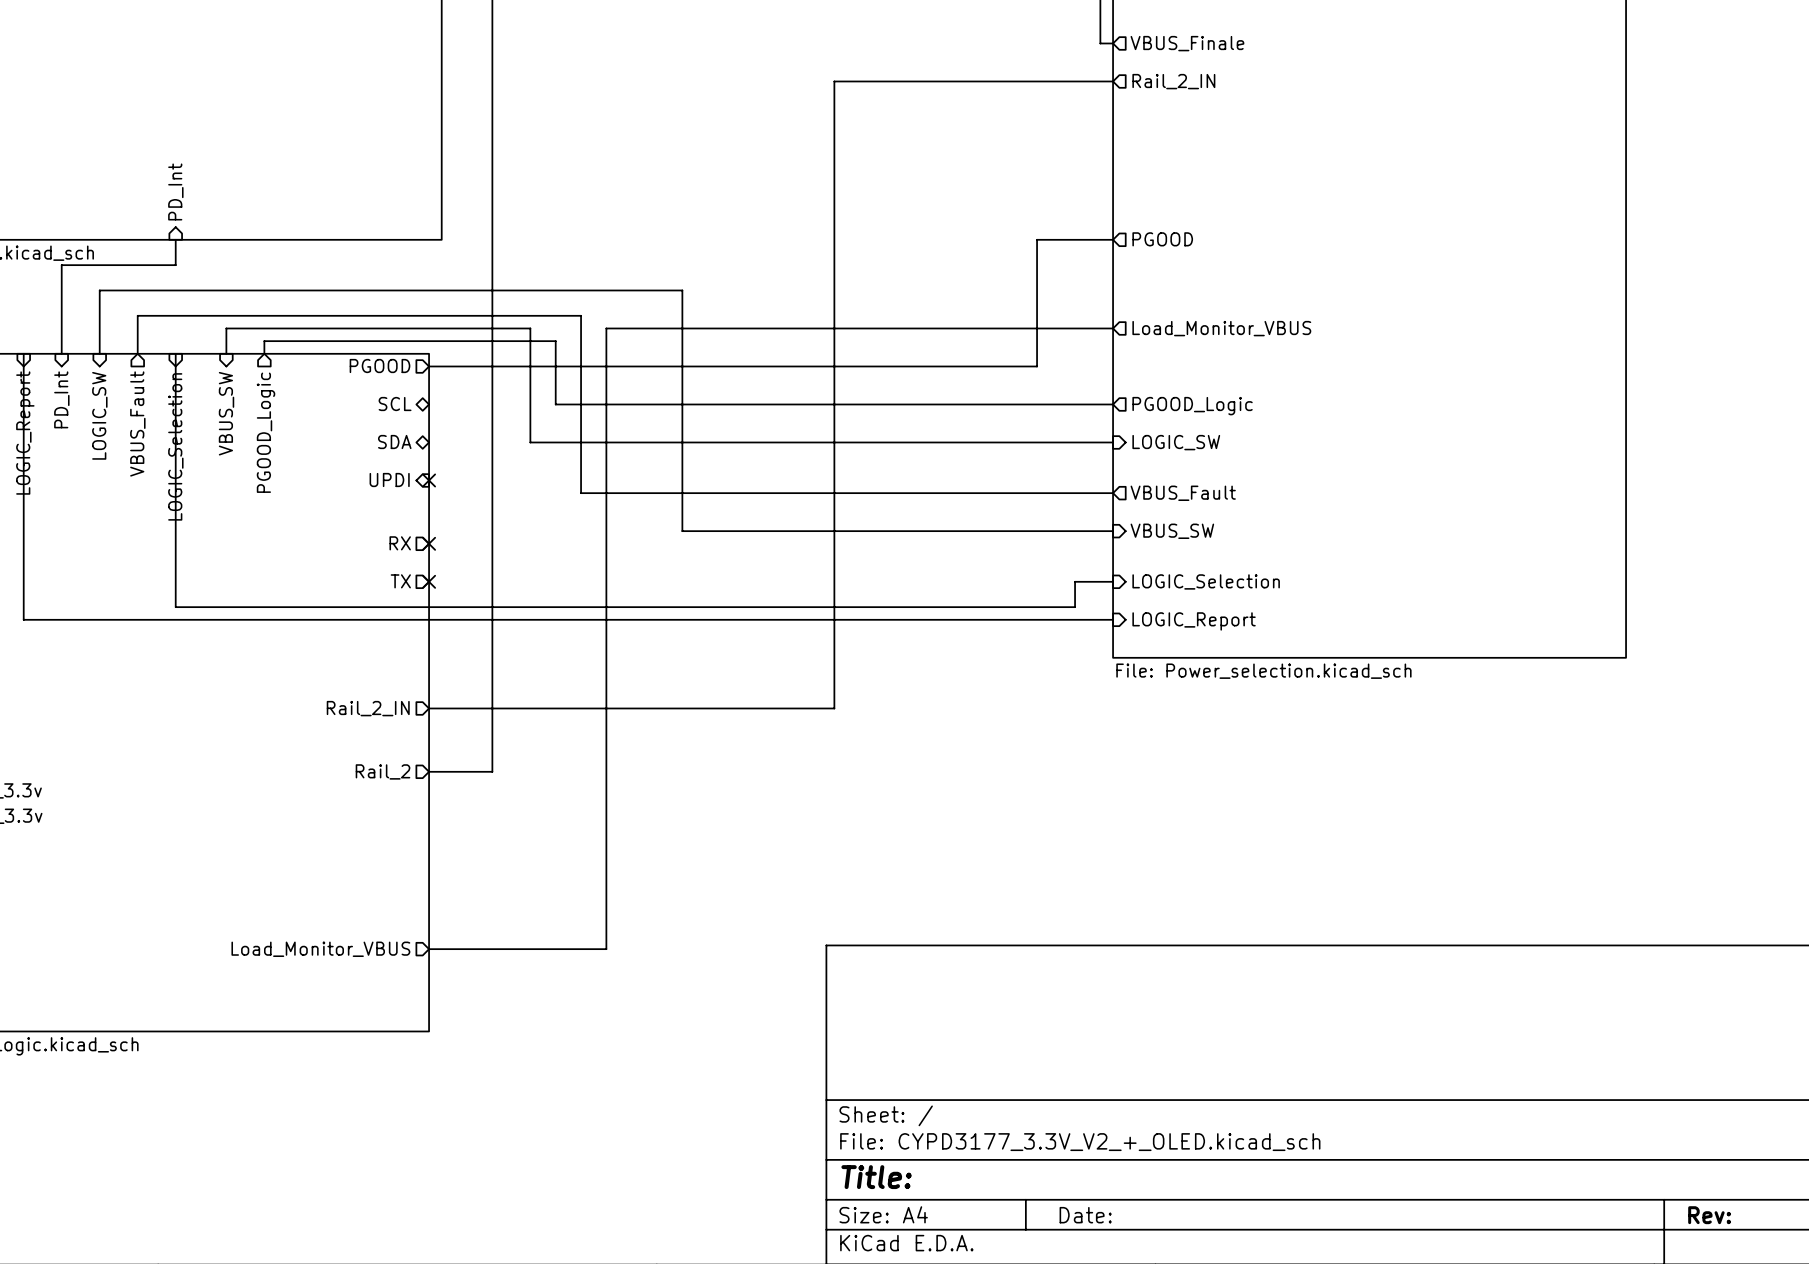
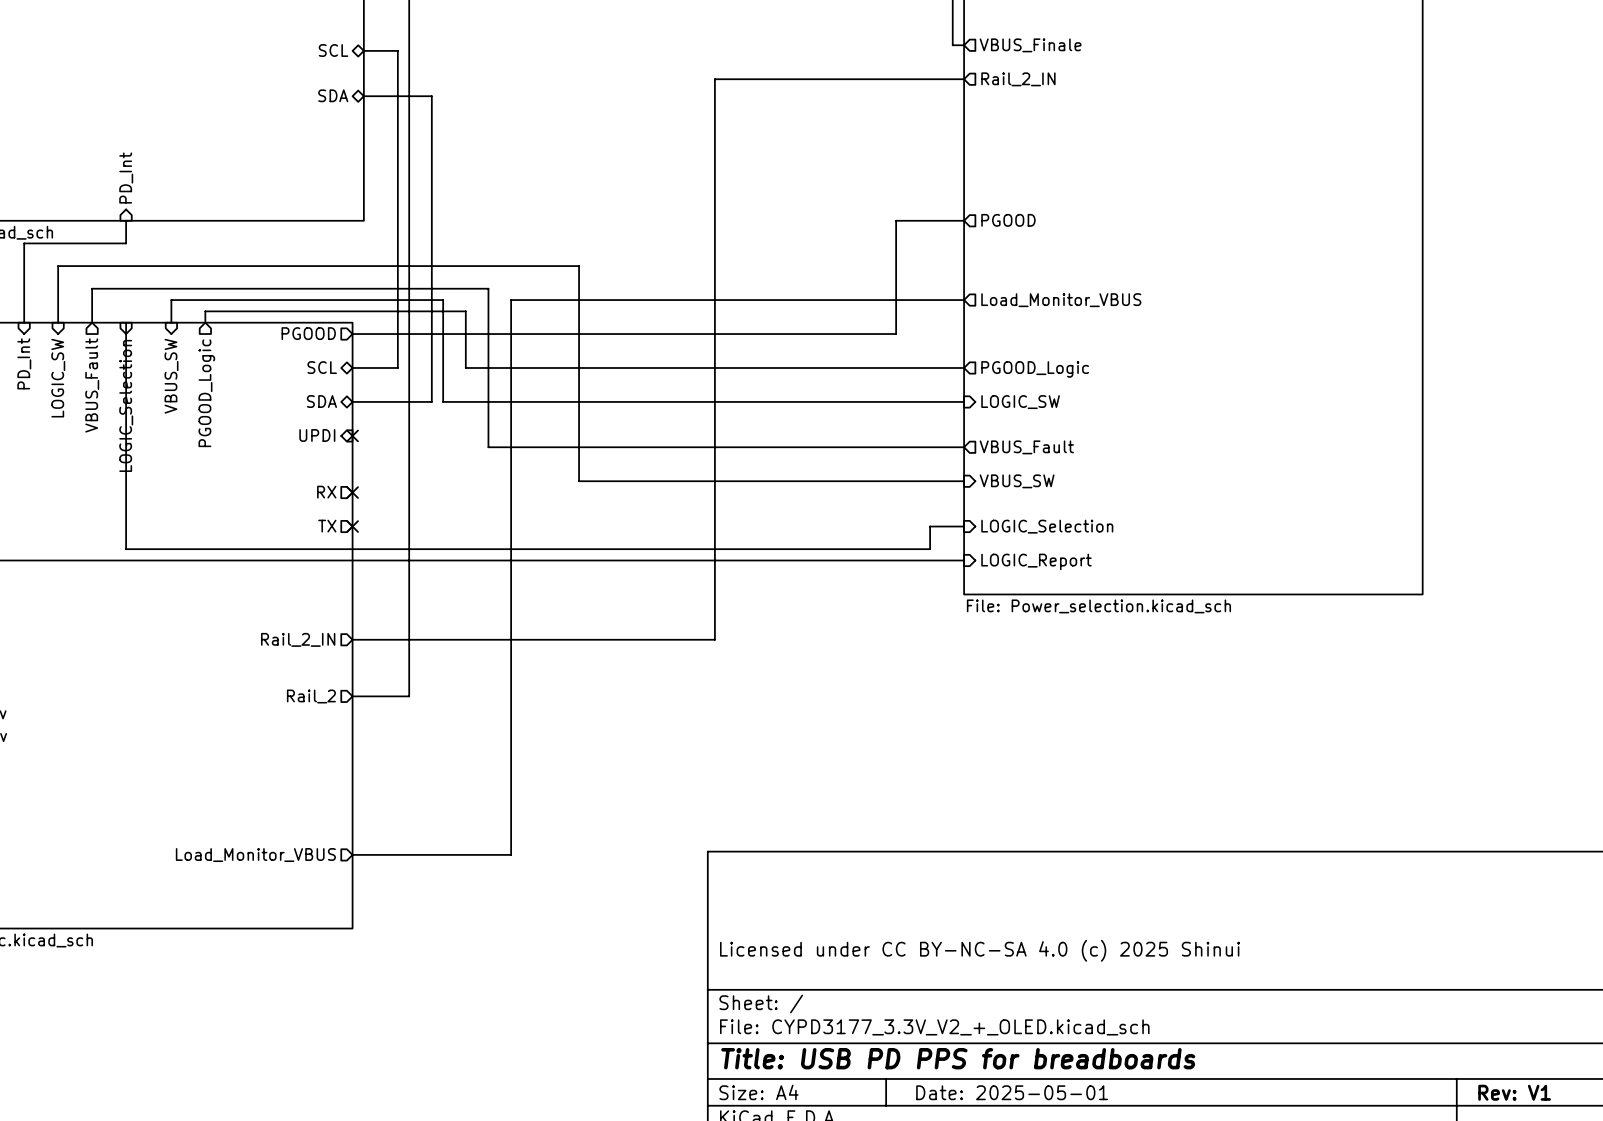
sheet pin: none -> SCL (333, 50)
wire: none -> (363, 50) (397, 50) (397, 367) (352, 367)
sheet pin: none -> SDA (333, 95)
wire: none -> (363, 96) (431, 96) (431, 401) (352, 401)
title block: none -> Licensed under CC BY-NC-SA 4.0 (c) 2025 Shinui (980, 950)
title block: Title: (876, 1177) -> Title: USB PD PPS for breadboards (958, 1058)
title block: Date: (1085, 1215) -> Date: 2025-05-01 (1012, 1092)
title block: Rev: (1709, 1215) -> Rev: V1 (1514, 1092)

